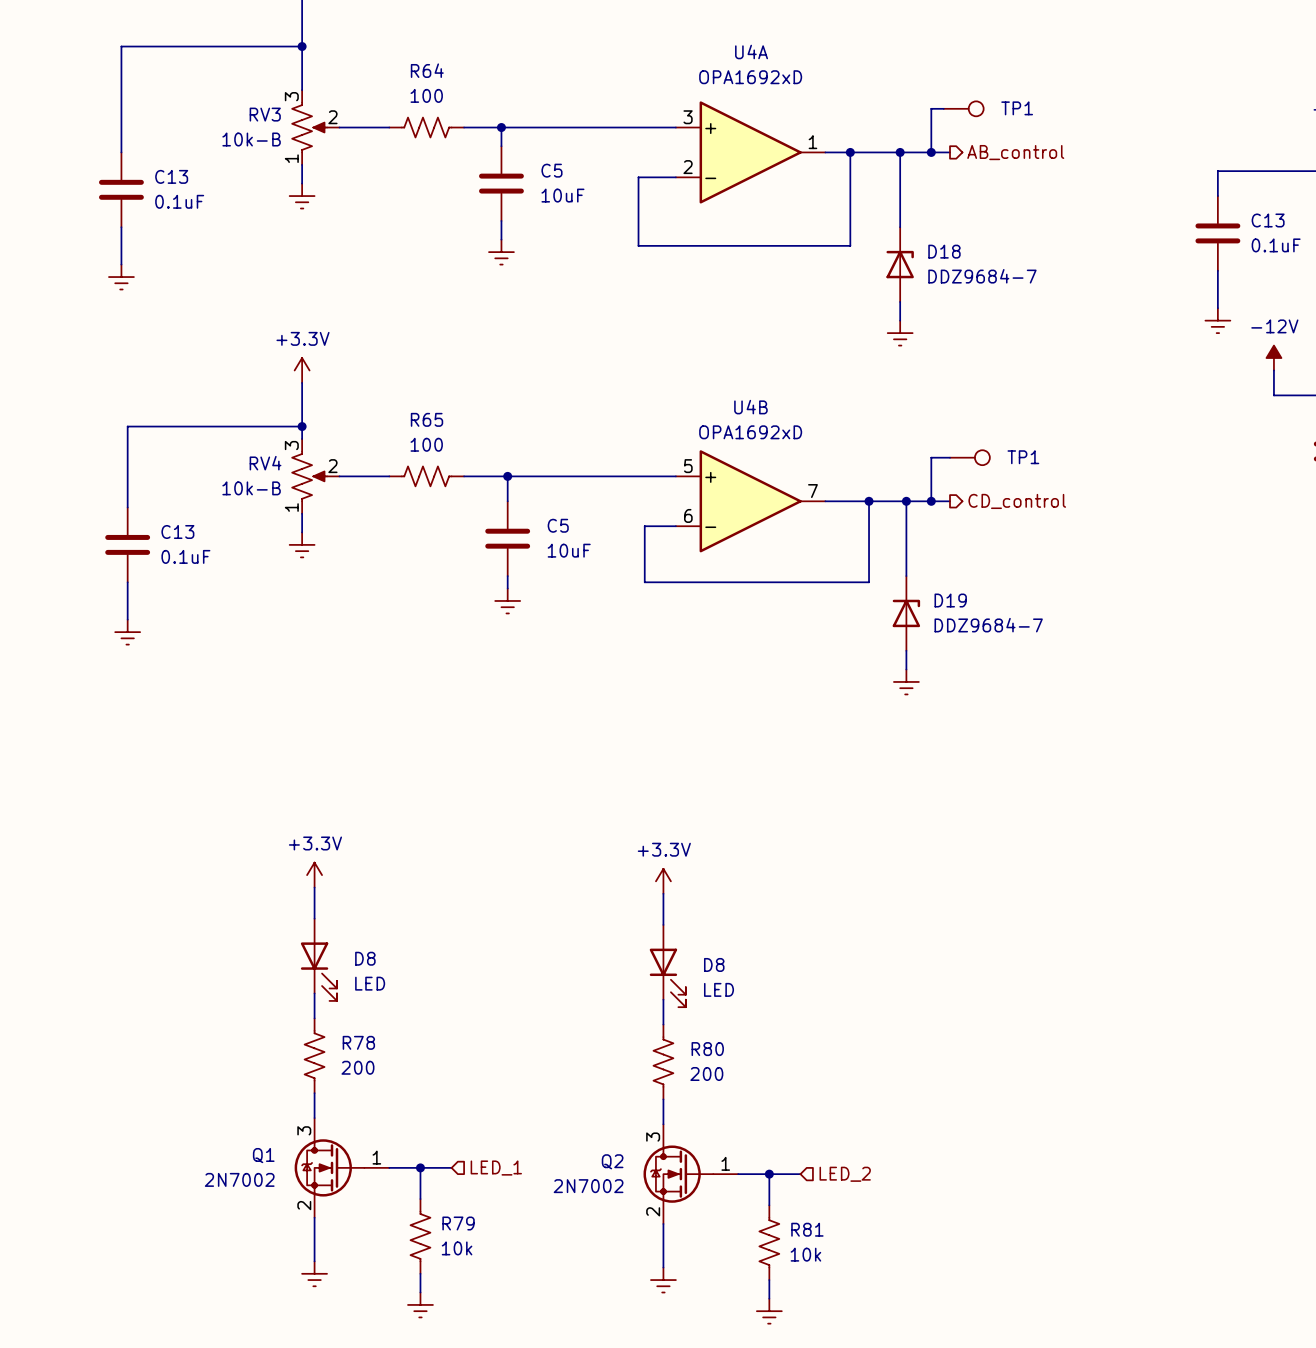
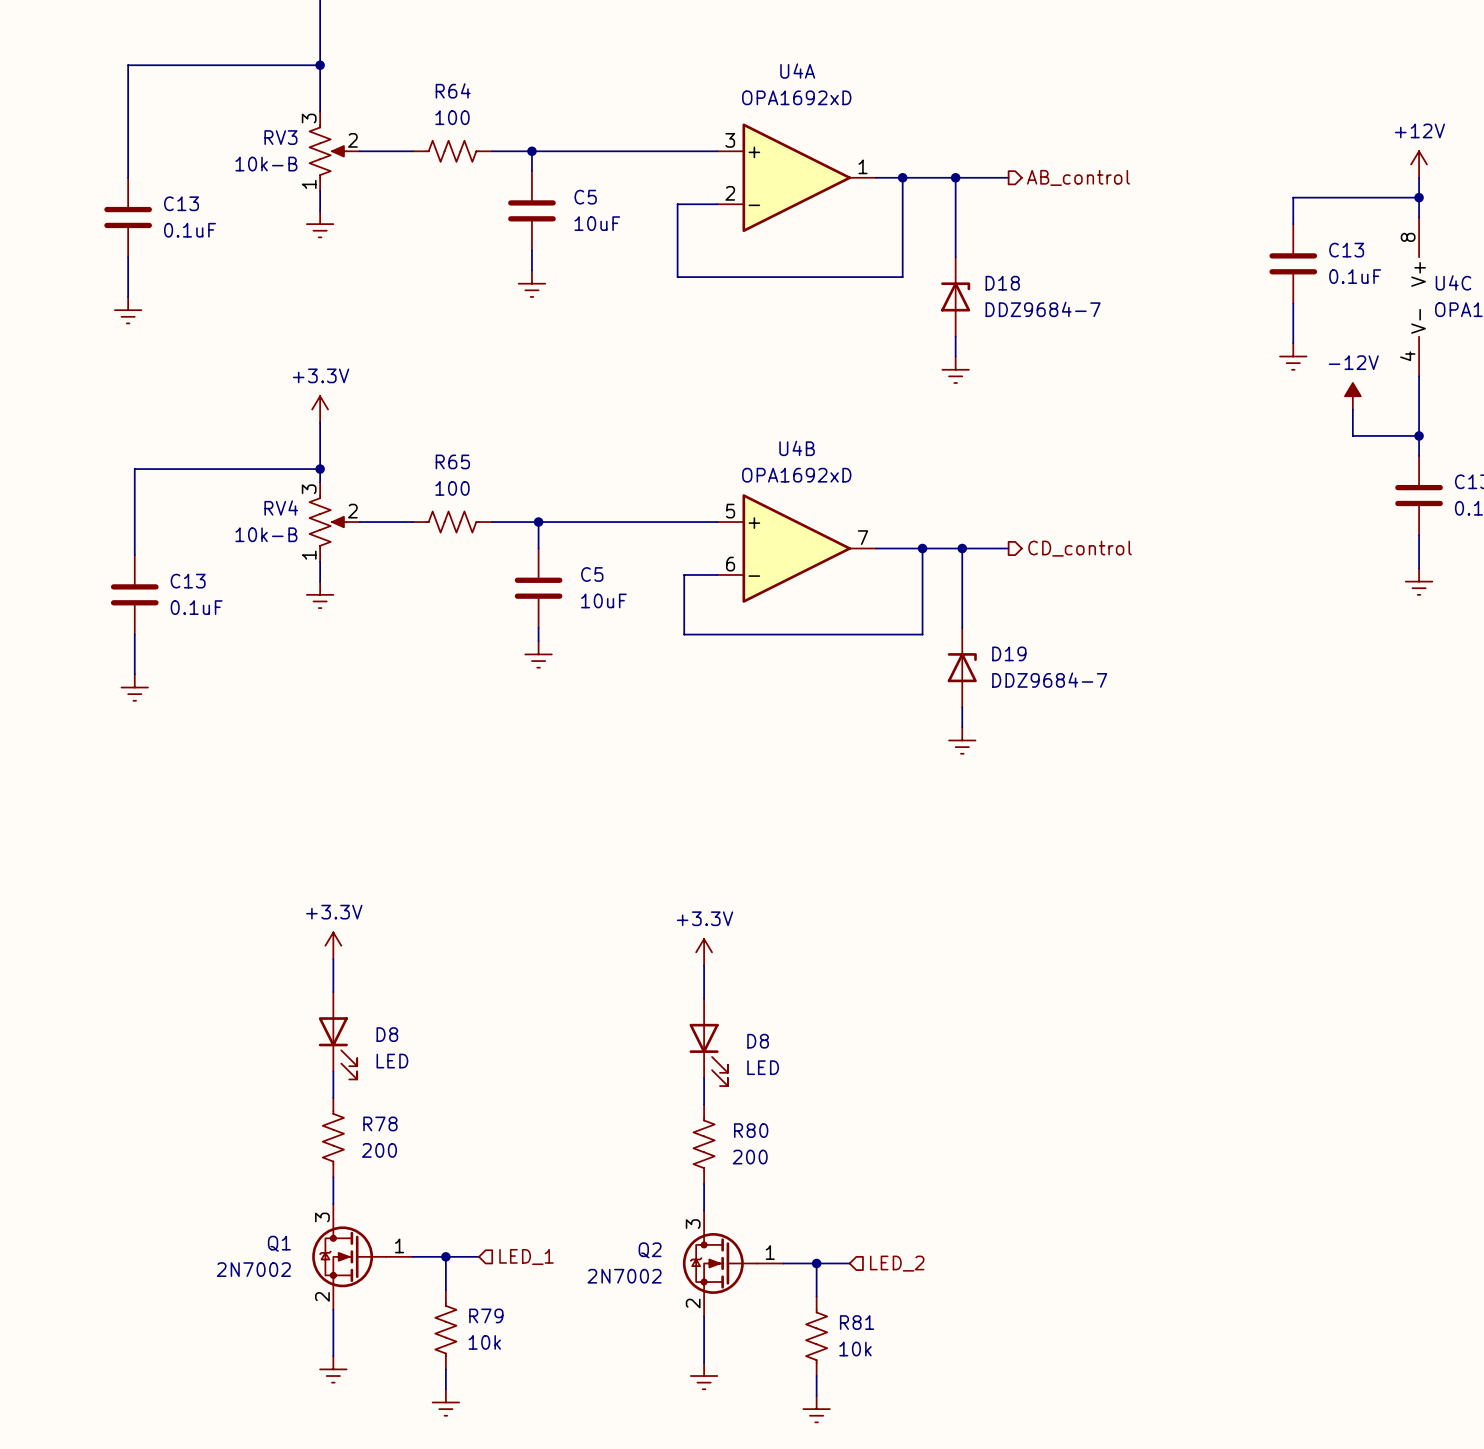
wire: (943, 108) (931, 108) (931, 152) -> none
TP1: (963, 108) -> none
junction: (931, 152) -> none
wire: (950, 457) (931, 457) (931, 501) -> none
TP1: (969, 457) -> none
junction: (931, 501) -> none

